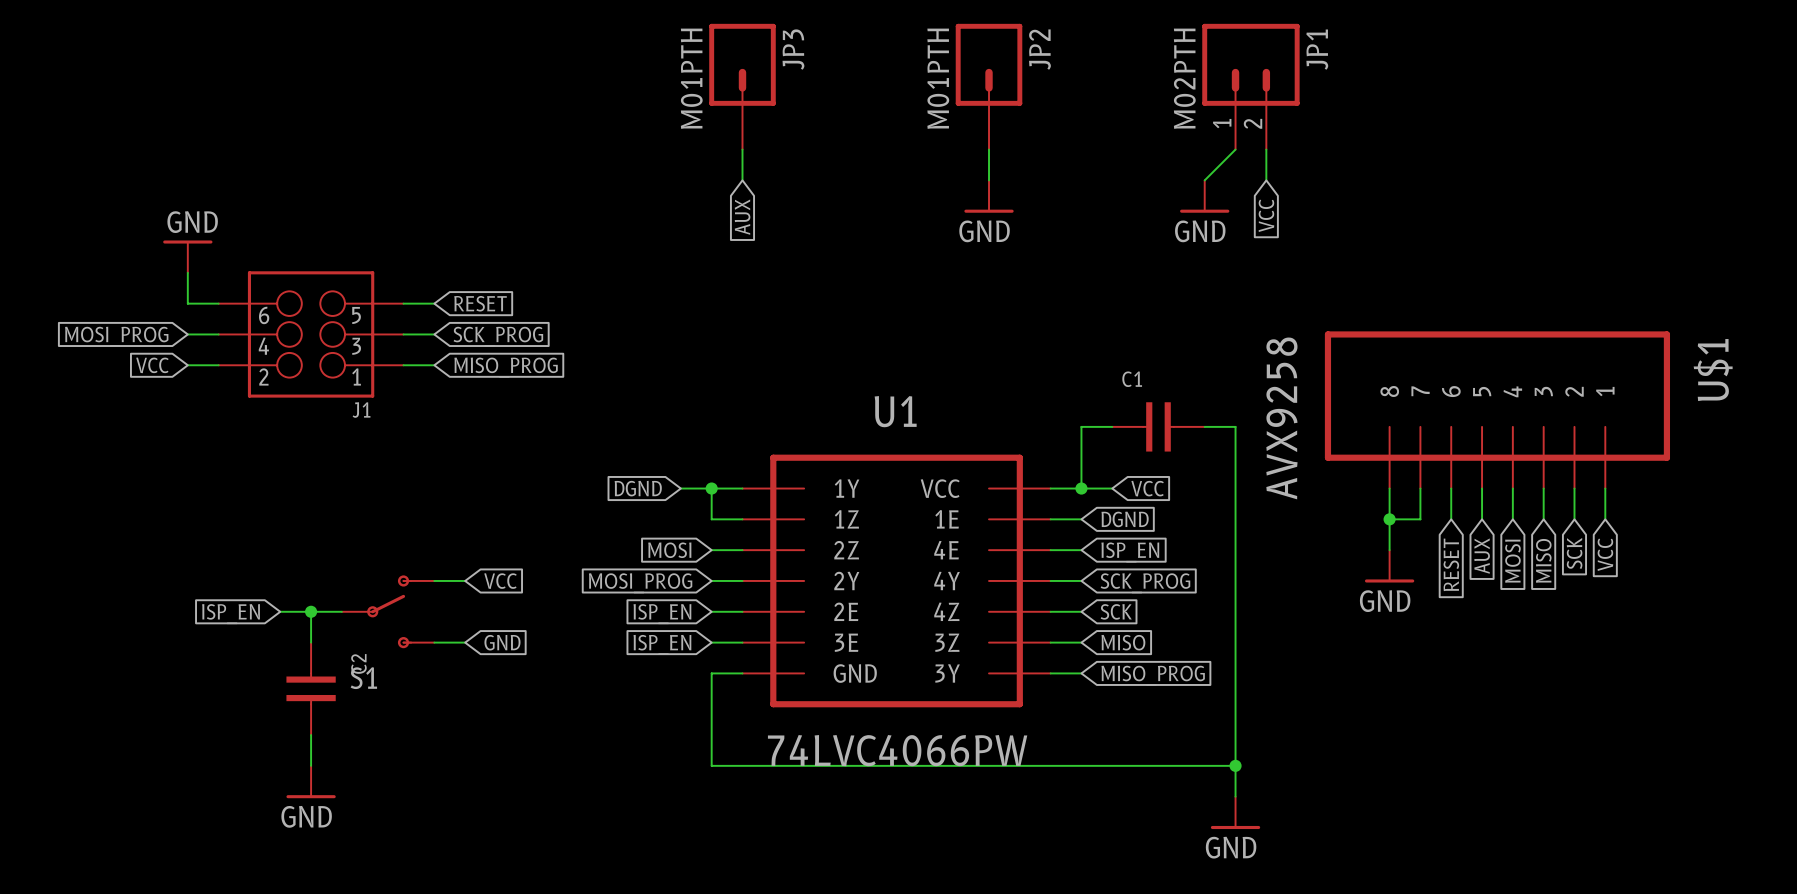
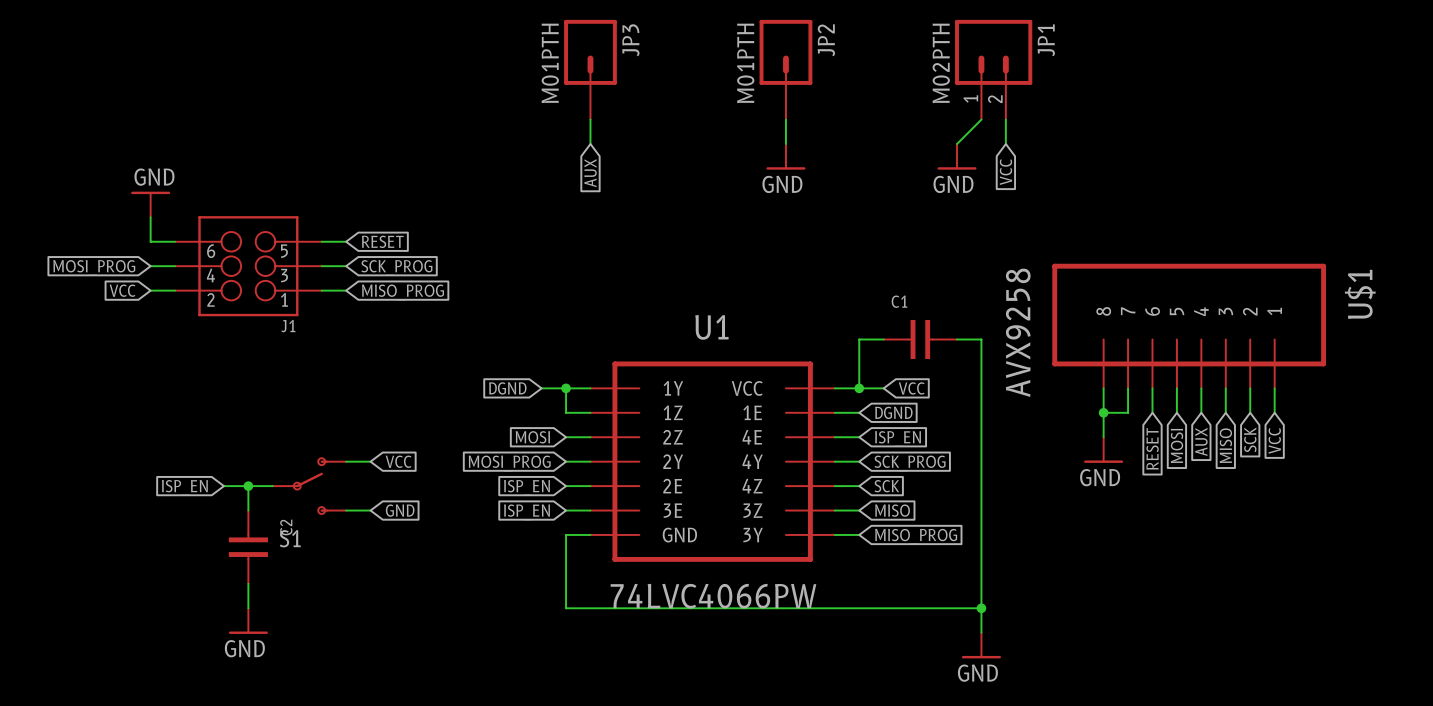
global label: AUX (1482, 556) -> MOSI (1176, 446)
global label: MOSI (1512, 561) -> AUX (1201, 441)

